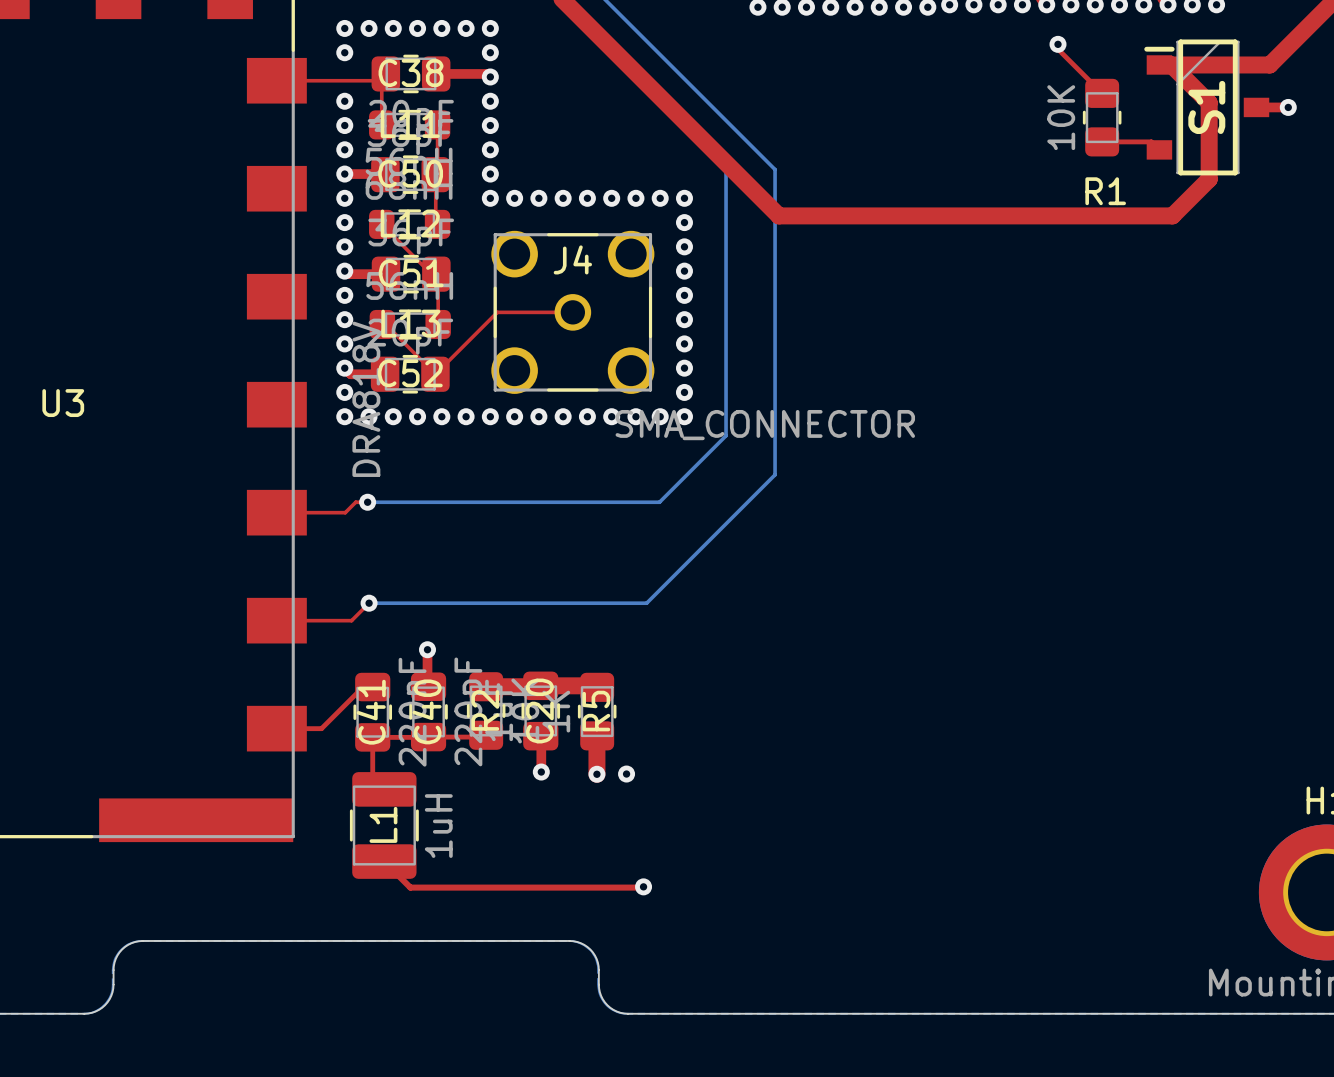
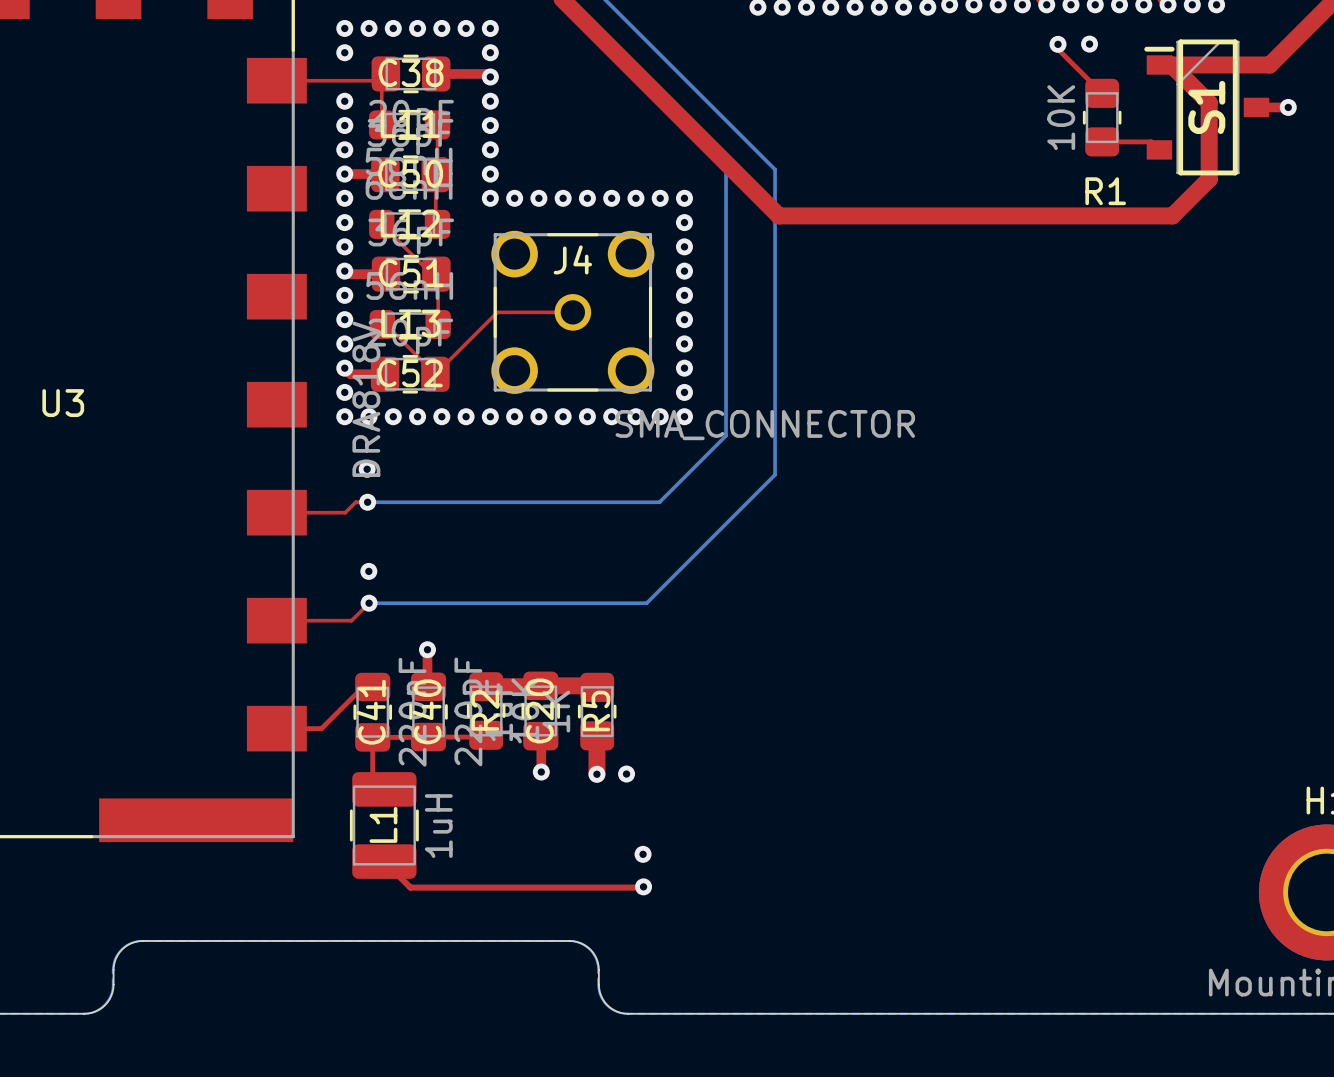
via: none -> (1089, 44)
via: none -> (367, 469)
via: none -> (368, 571)
via: none -> (643, 854)

